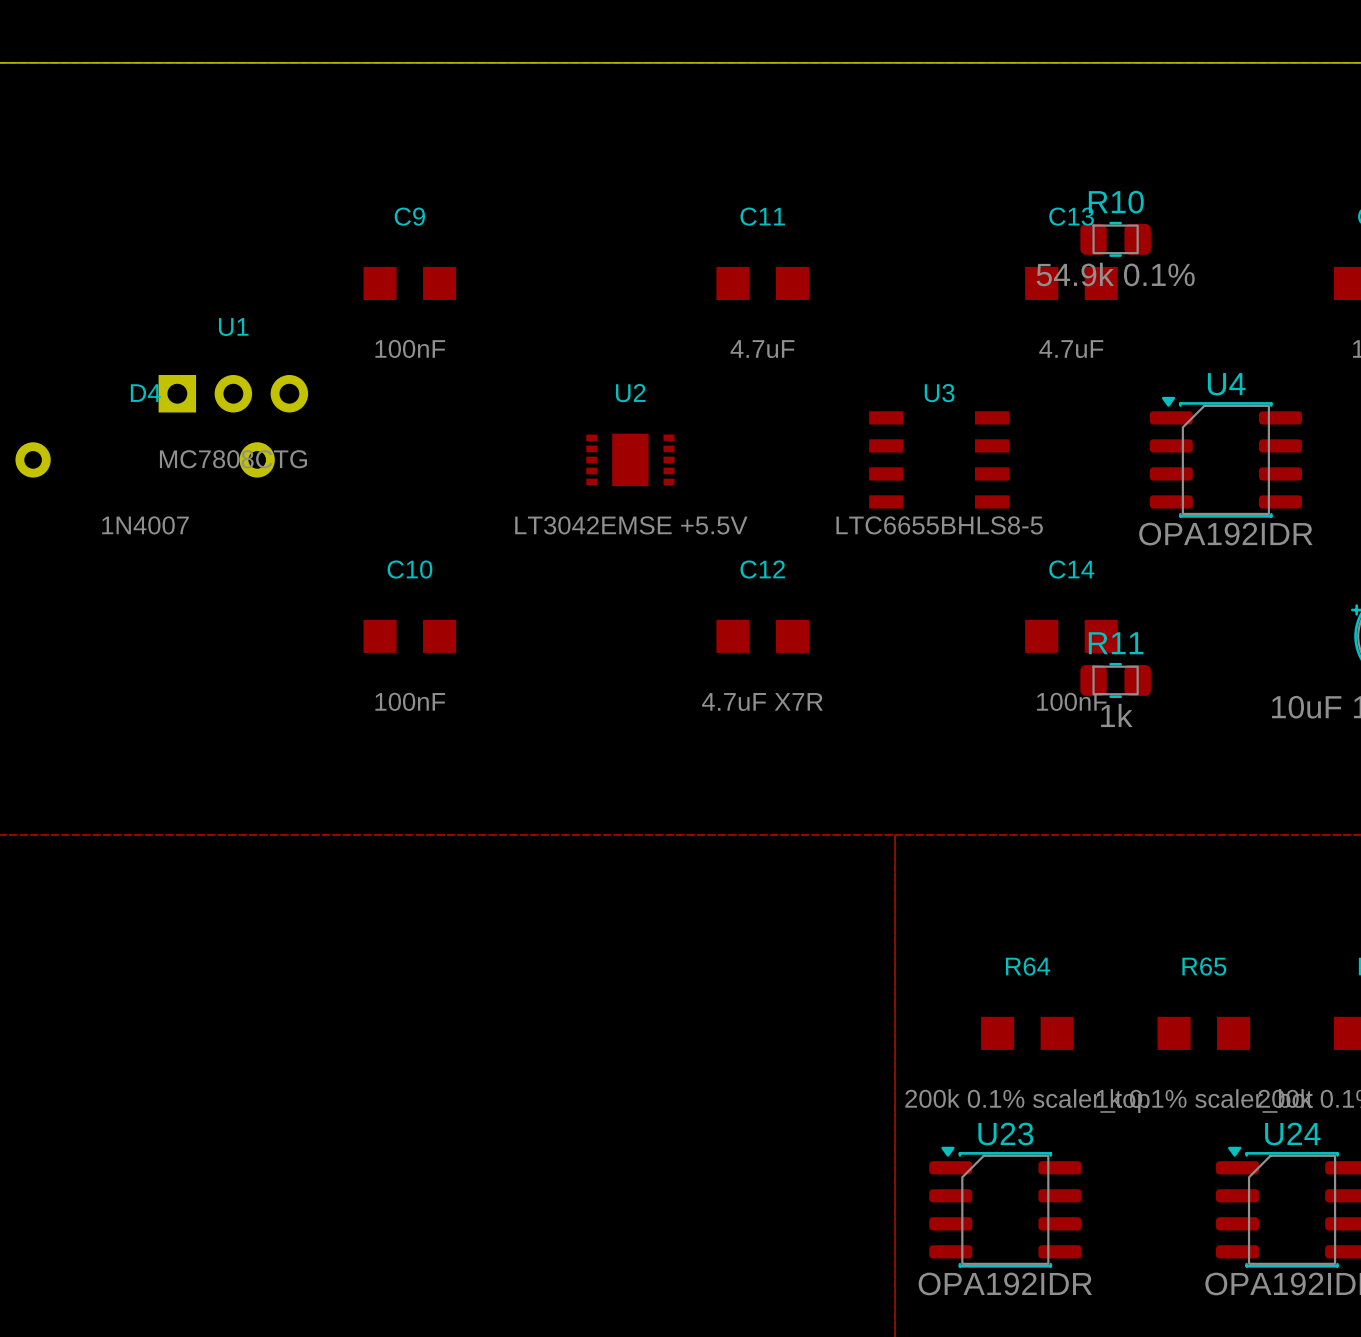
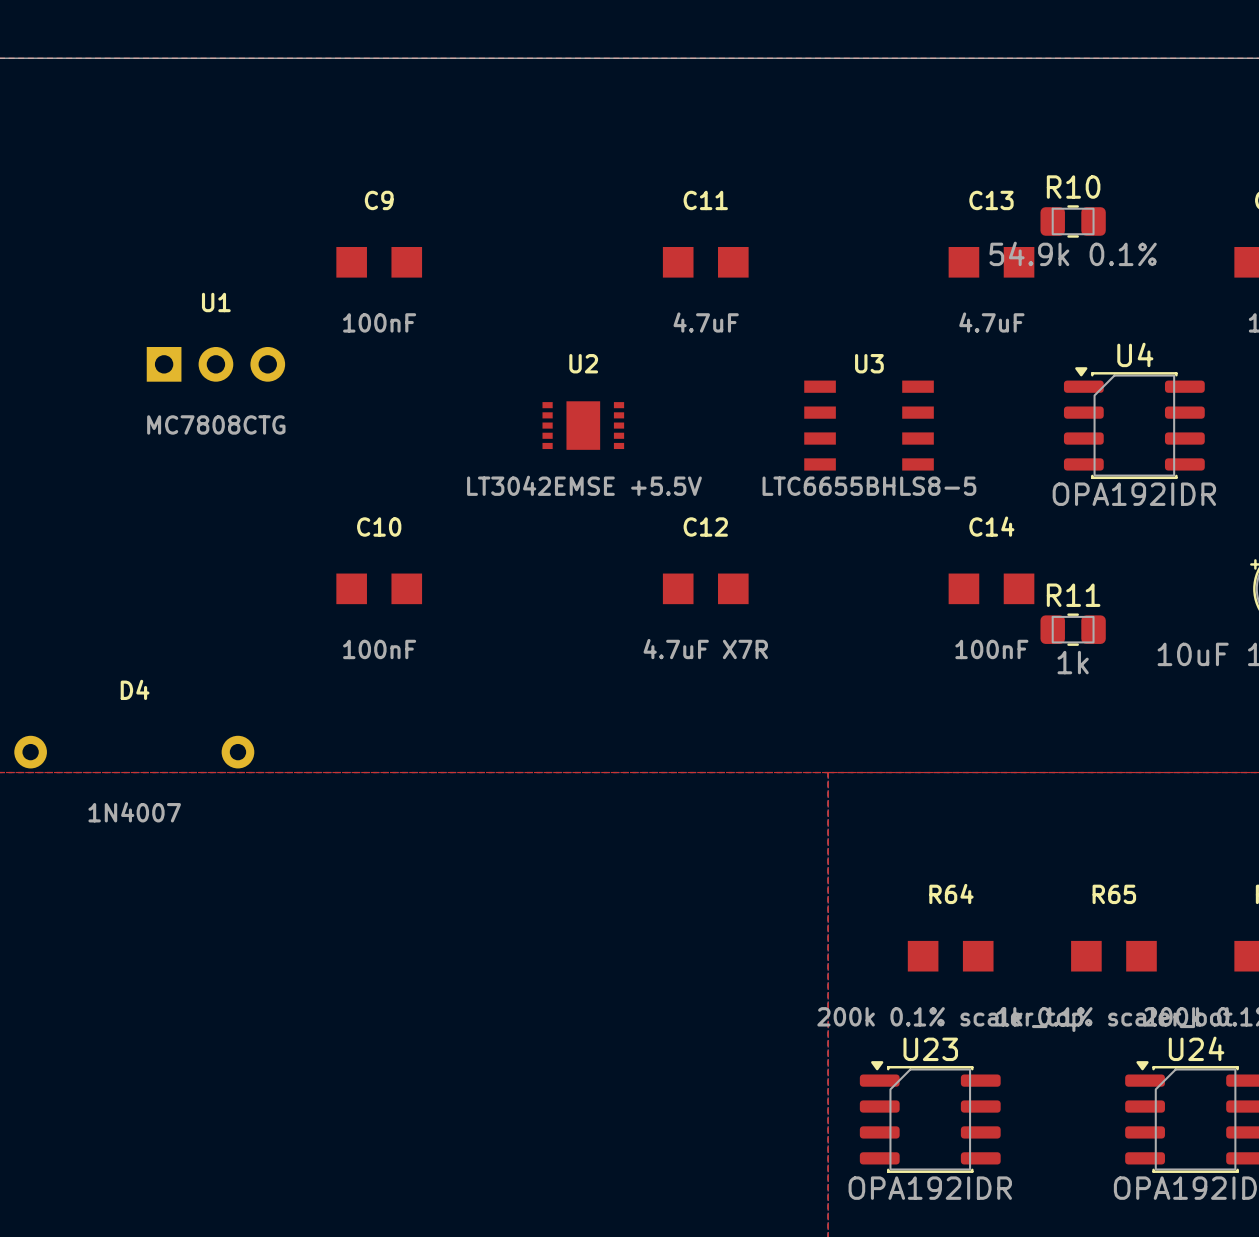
R10 position: (1115, 239) -> (1073, 221)
D4 position: (145, 459) -> (134, 752)
R11 position: (1115, 680) -> (1073, 629)

